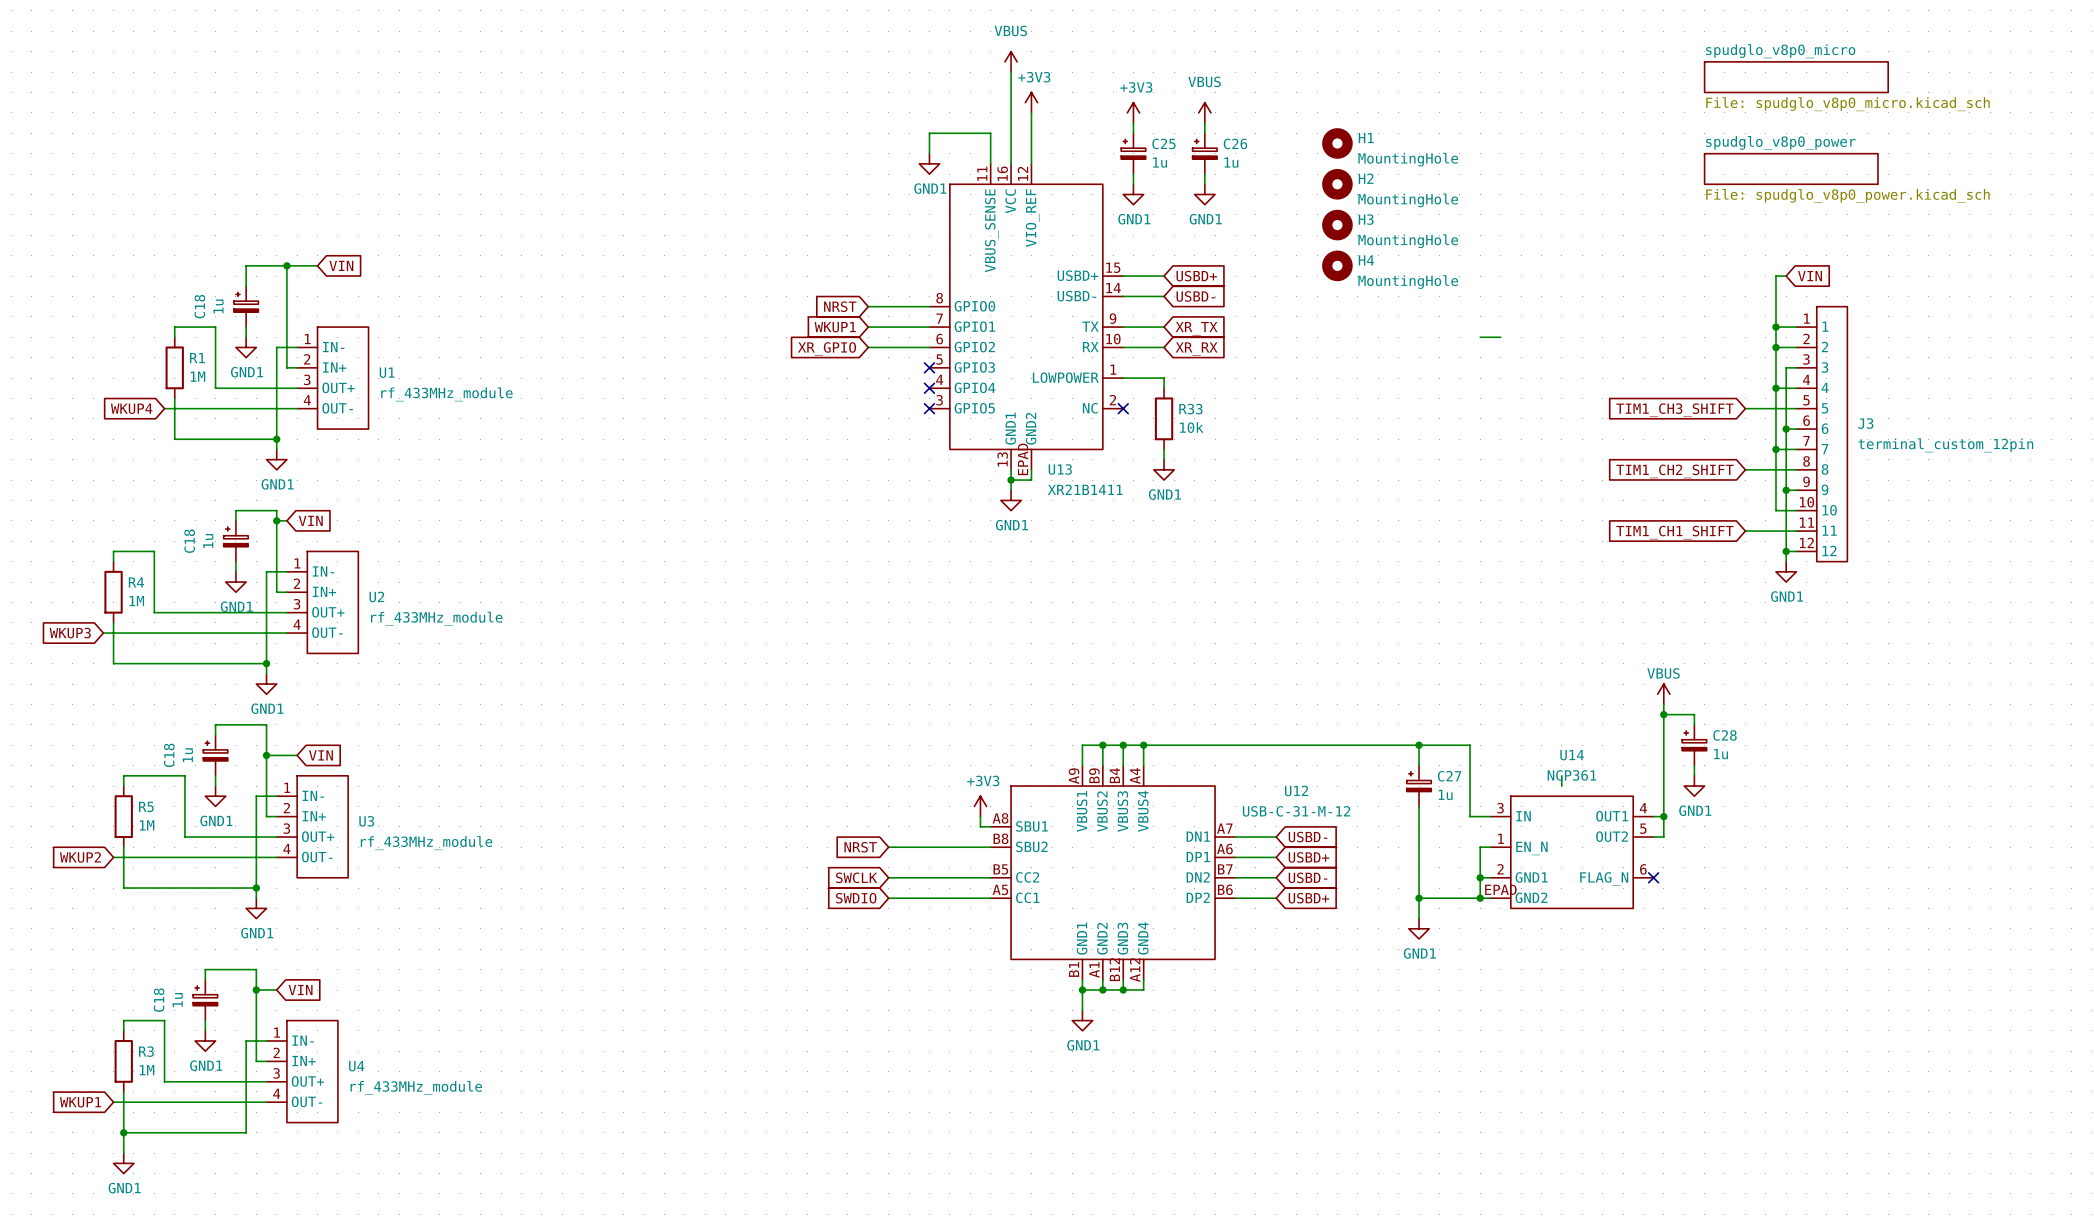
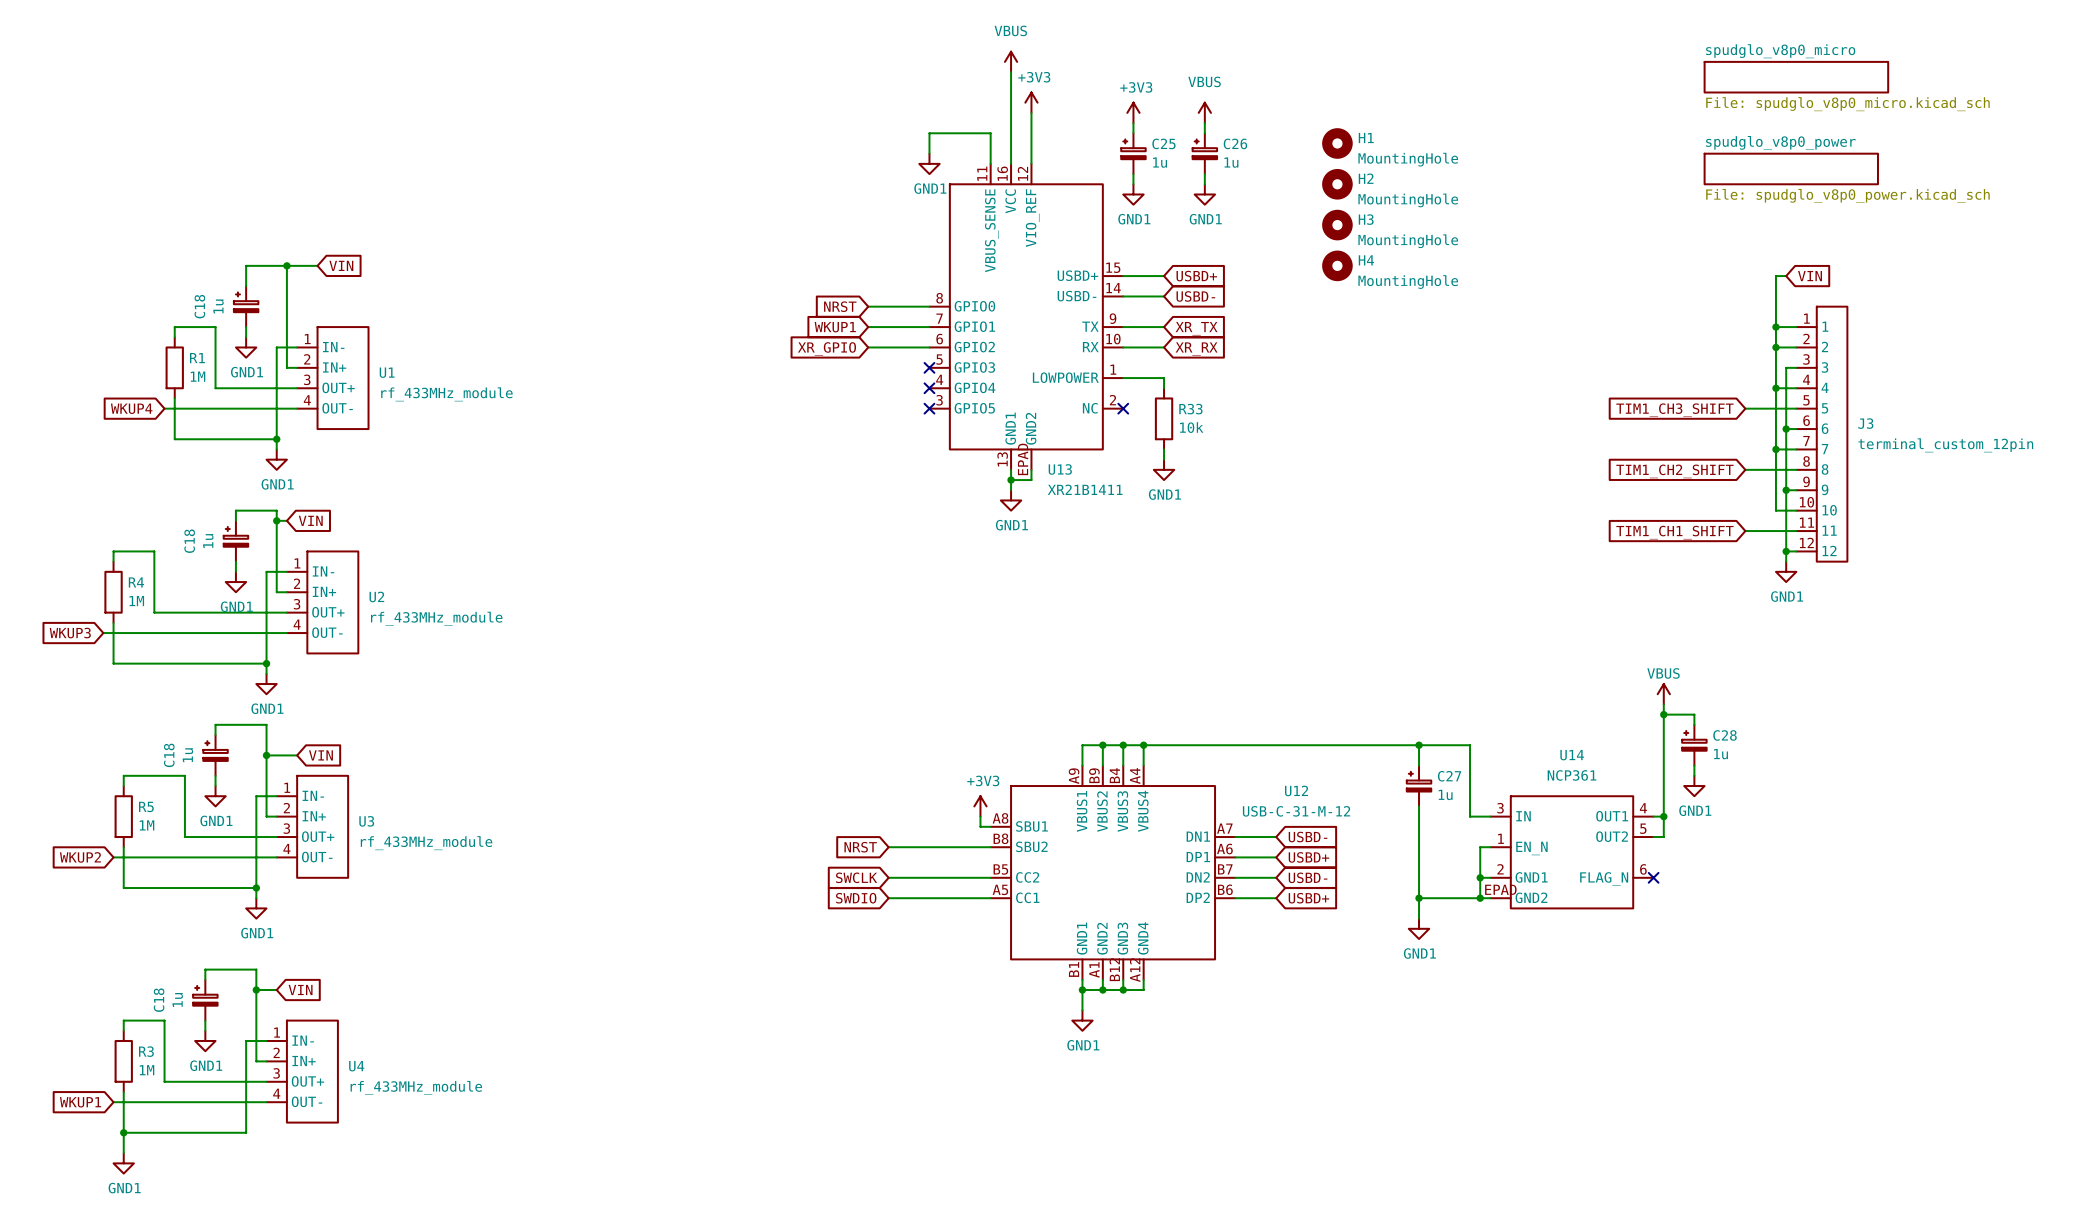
wire: (1480, 337) (1500, 337) -> none
wire: (1561, 775) (1561, 786) -> none

